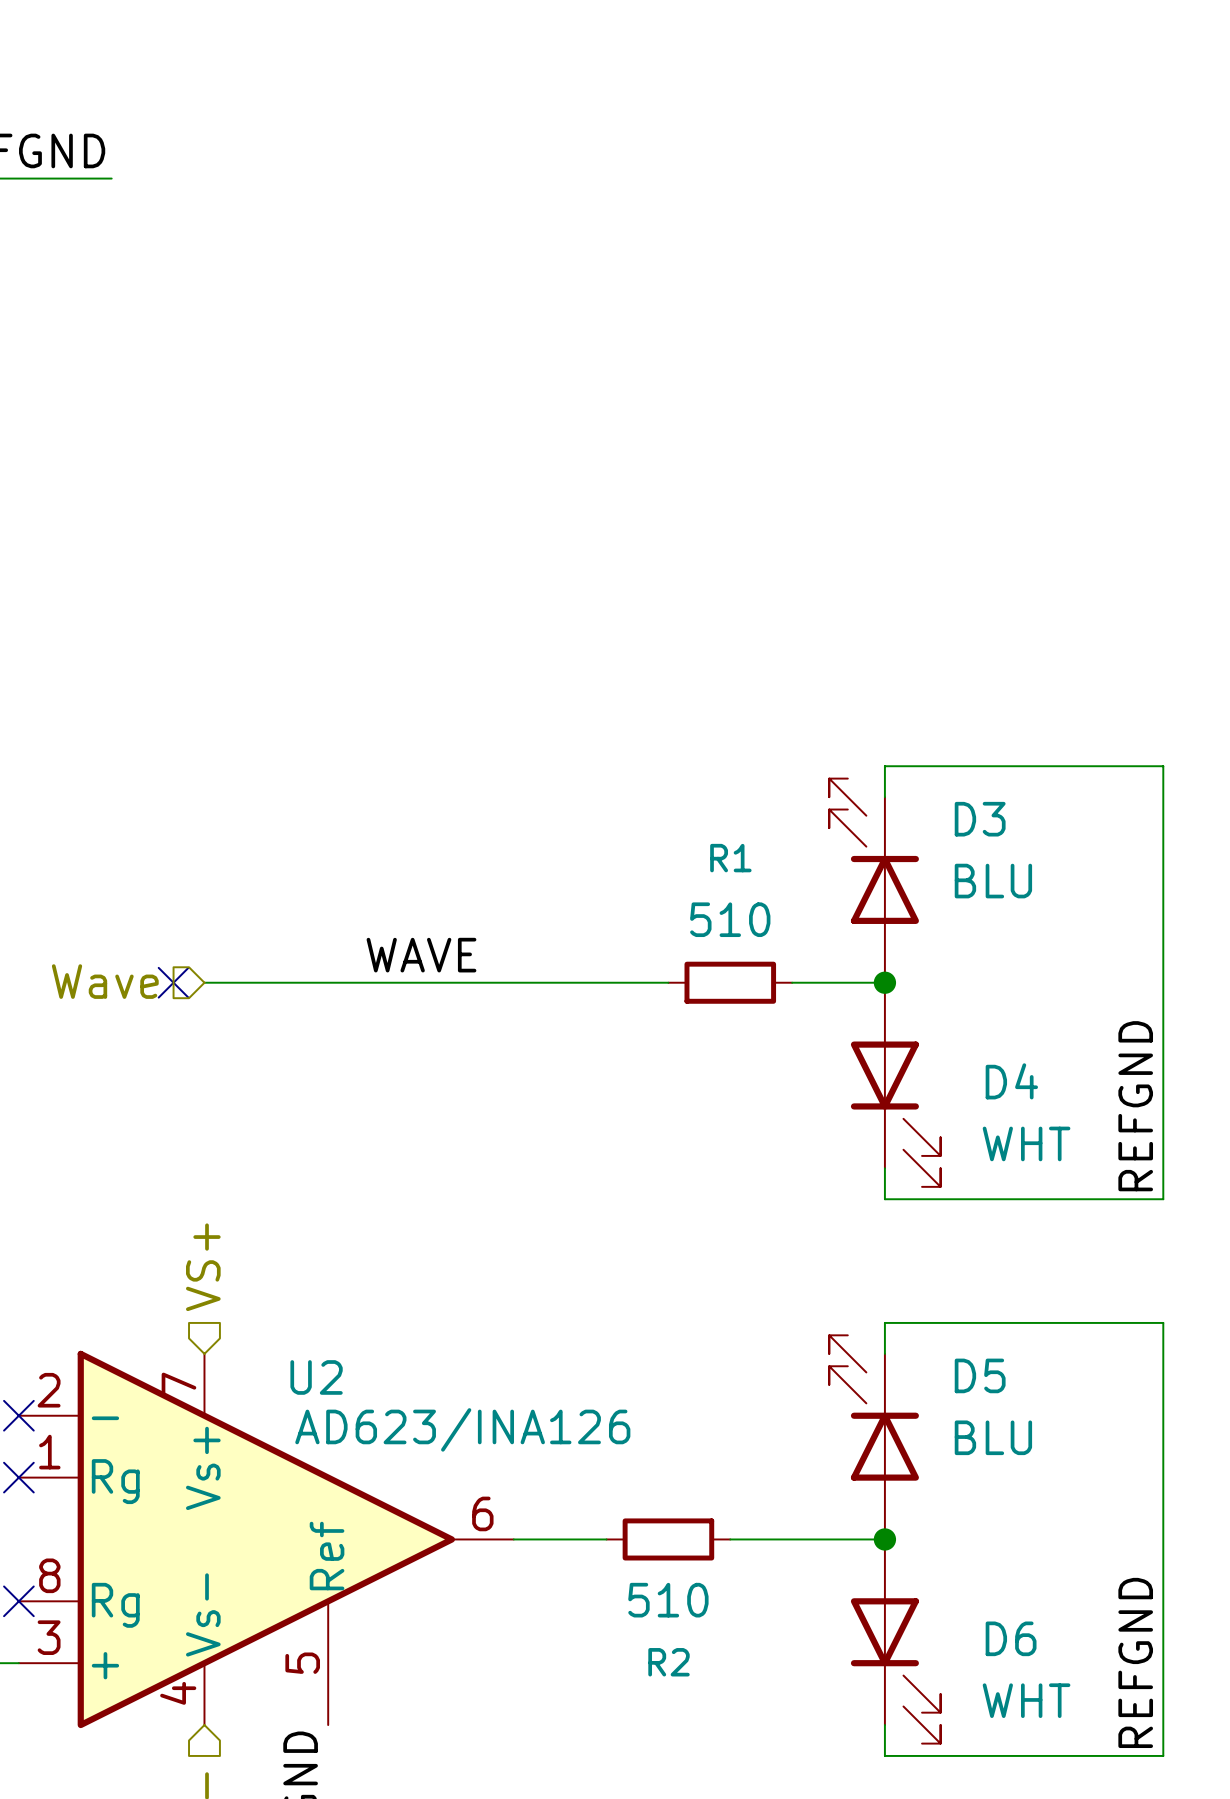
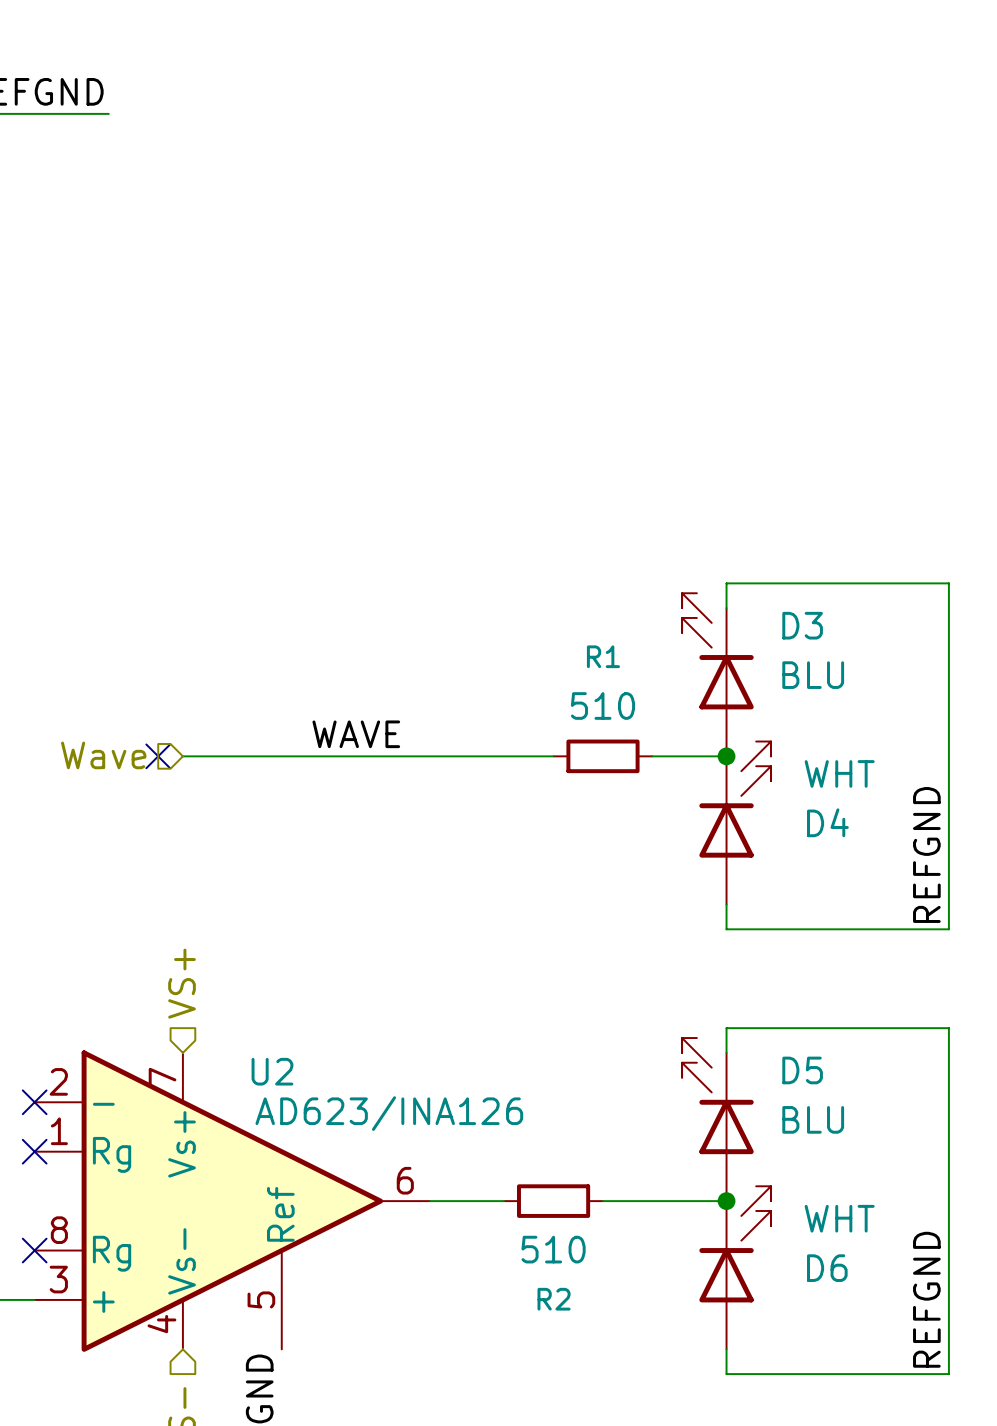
D4 flip: as is (895, 1114) -> up-down (735, 799)
D6 flip: as is (895, 1670) -> up-down (735, 1244)

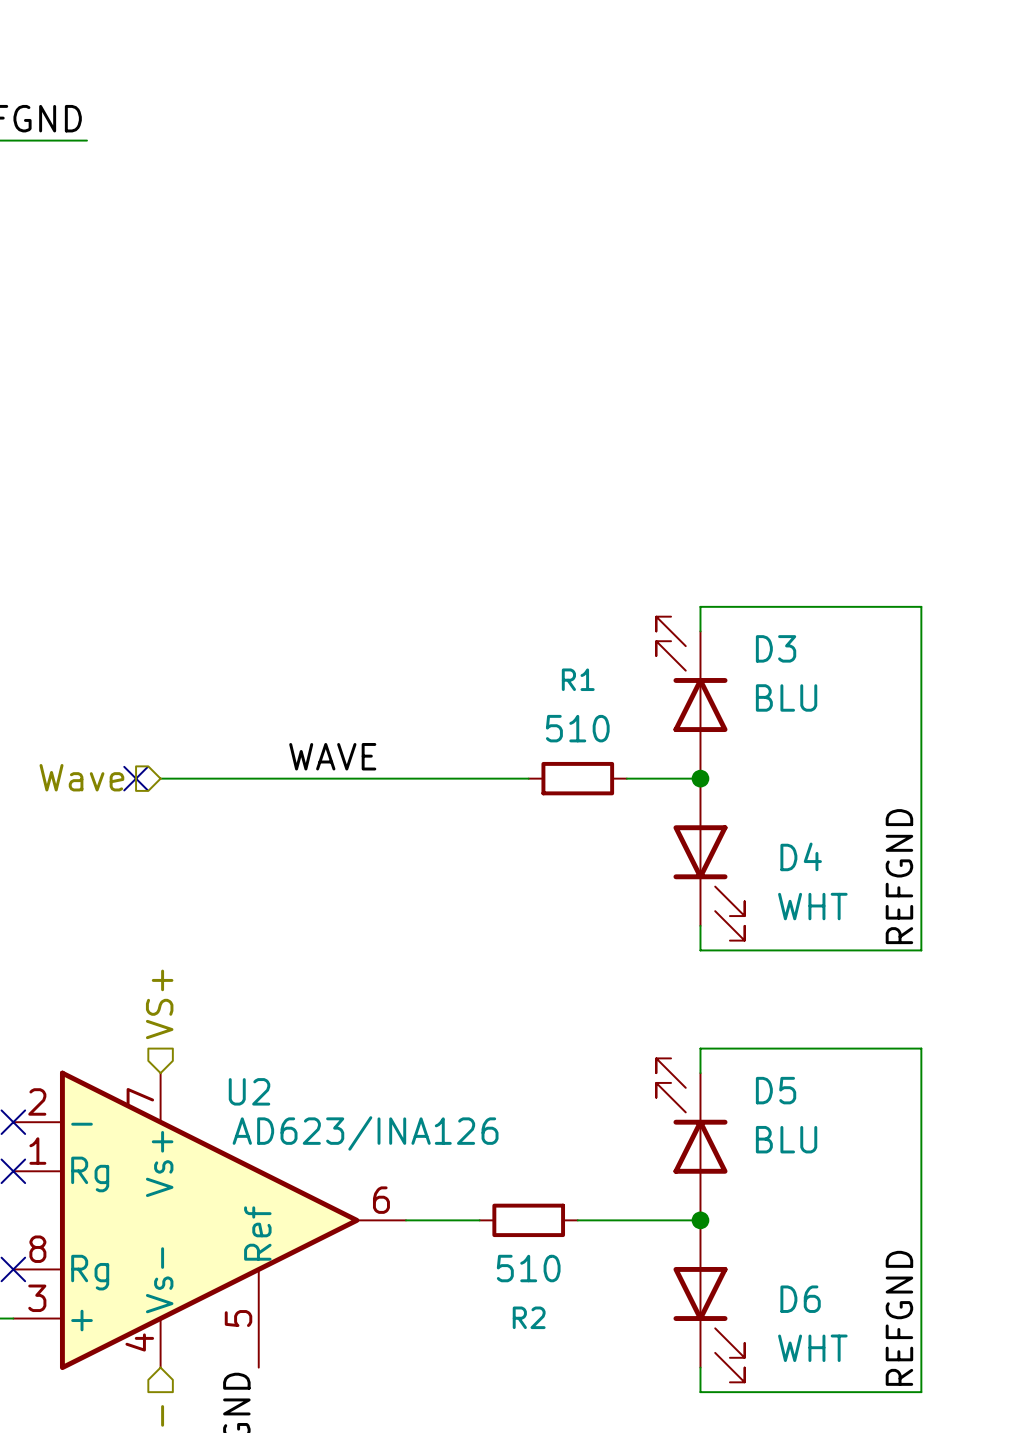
D4 flip: as is (735, 799) -> up-down (709, 882)
D6 flip: as is (735, 1244) -> up-down (709, 1324)

